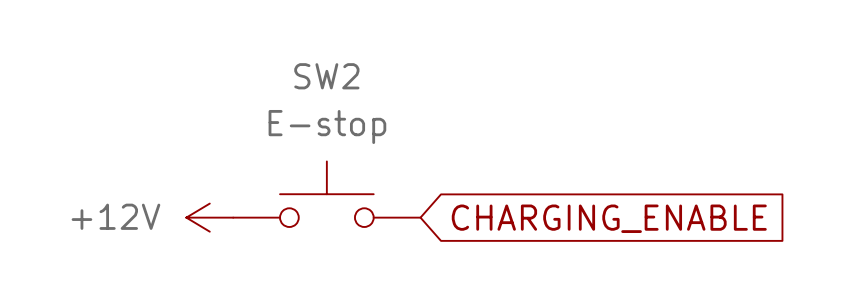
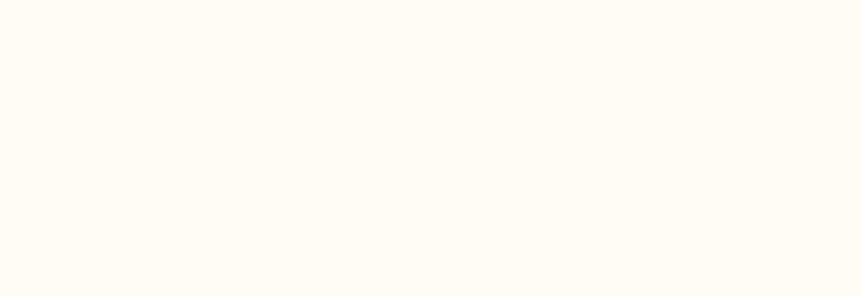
SW2: E-stop (326, 194) -> none
power symbol: +12V (209, 217) -> none
global label: CHARGING_ENABLE (609, 218) -> none

